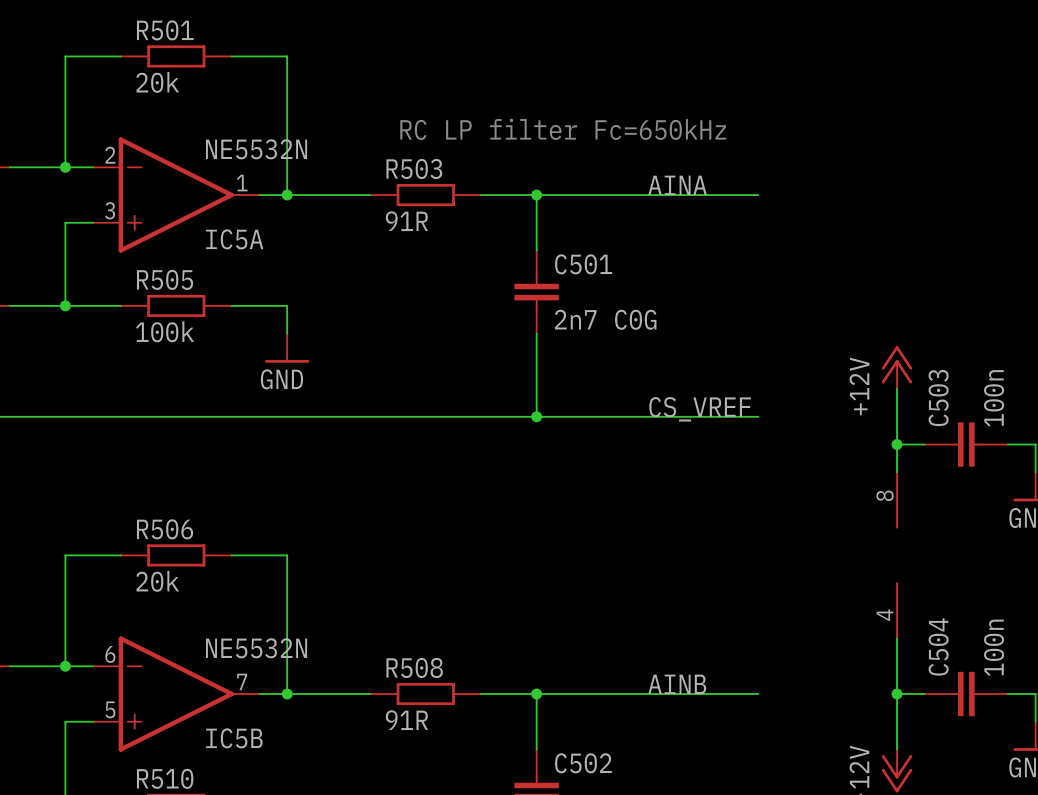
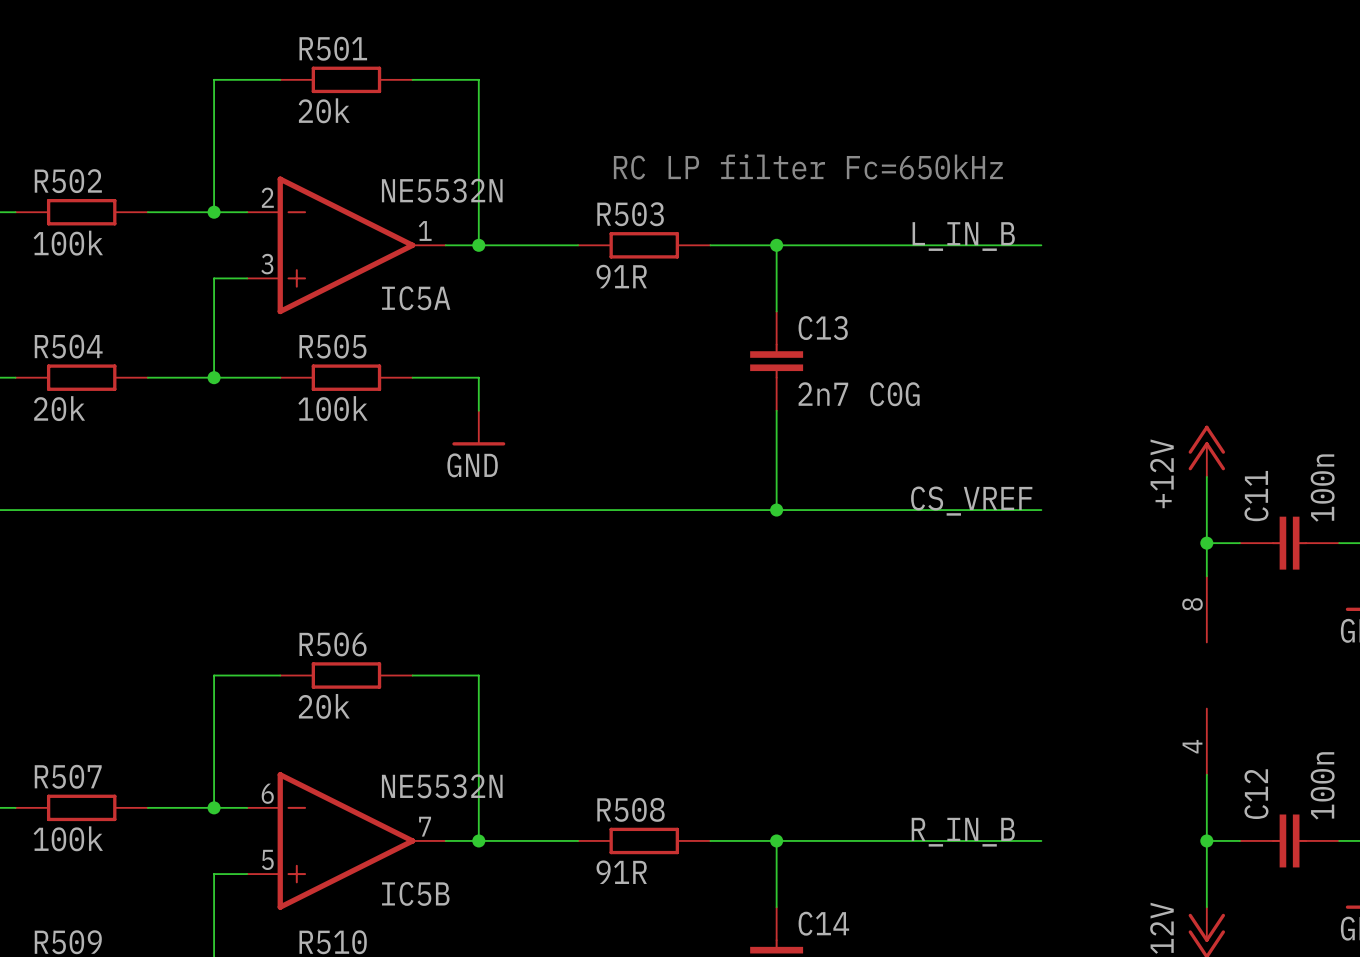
label: AINA (677, 185) -> L_IN_B (963, 236)
C501 name: C501 (583, 264) -> C13 (823, 328)
C503 name: C503 (938, 398) -> C11 (1256, 496)
C504 name: C504 (938, 646) -> C12 (1256, 794)
label: AINB (677, 684) -> R_IN_B (963, 832)
C502 name: C502 (583, 763) -> C14 (823, 923)

